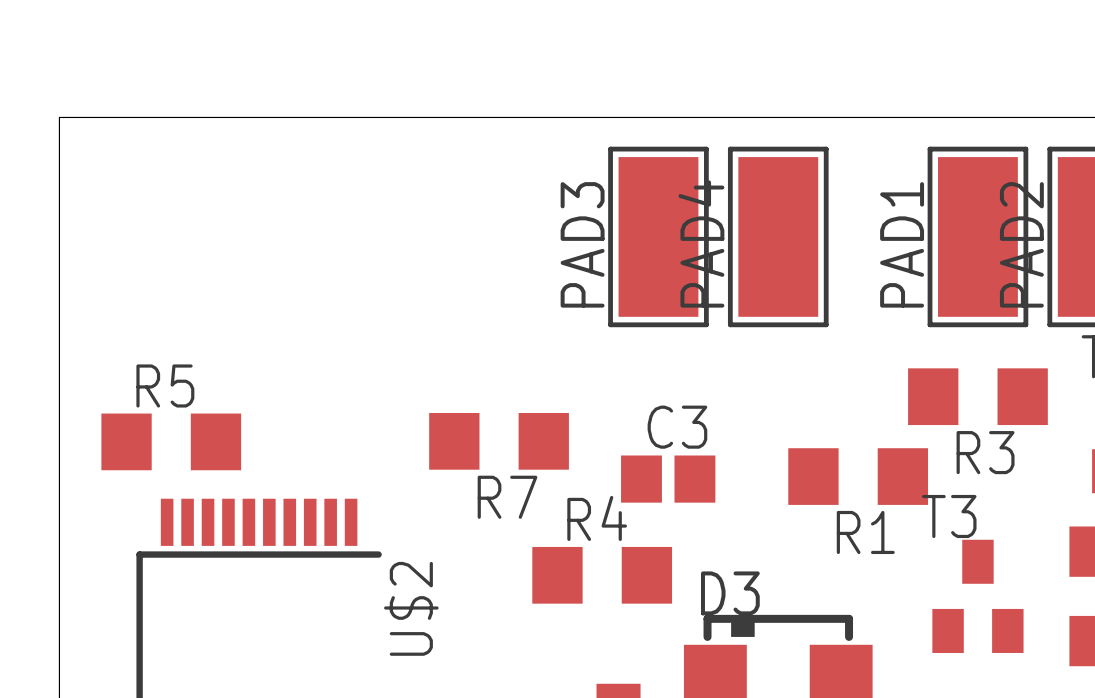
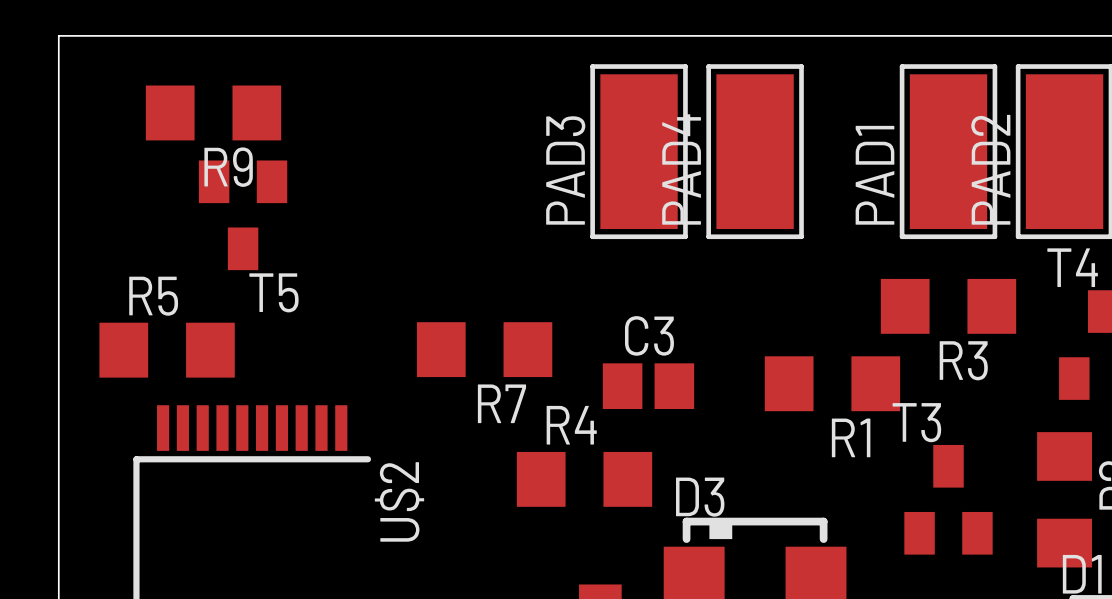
R9: none -> (213, 112)
T5: none -> (243, 215)

